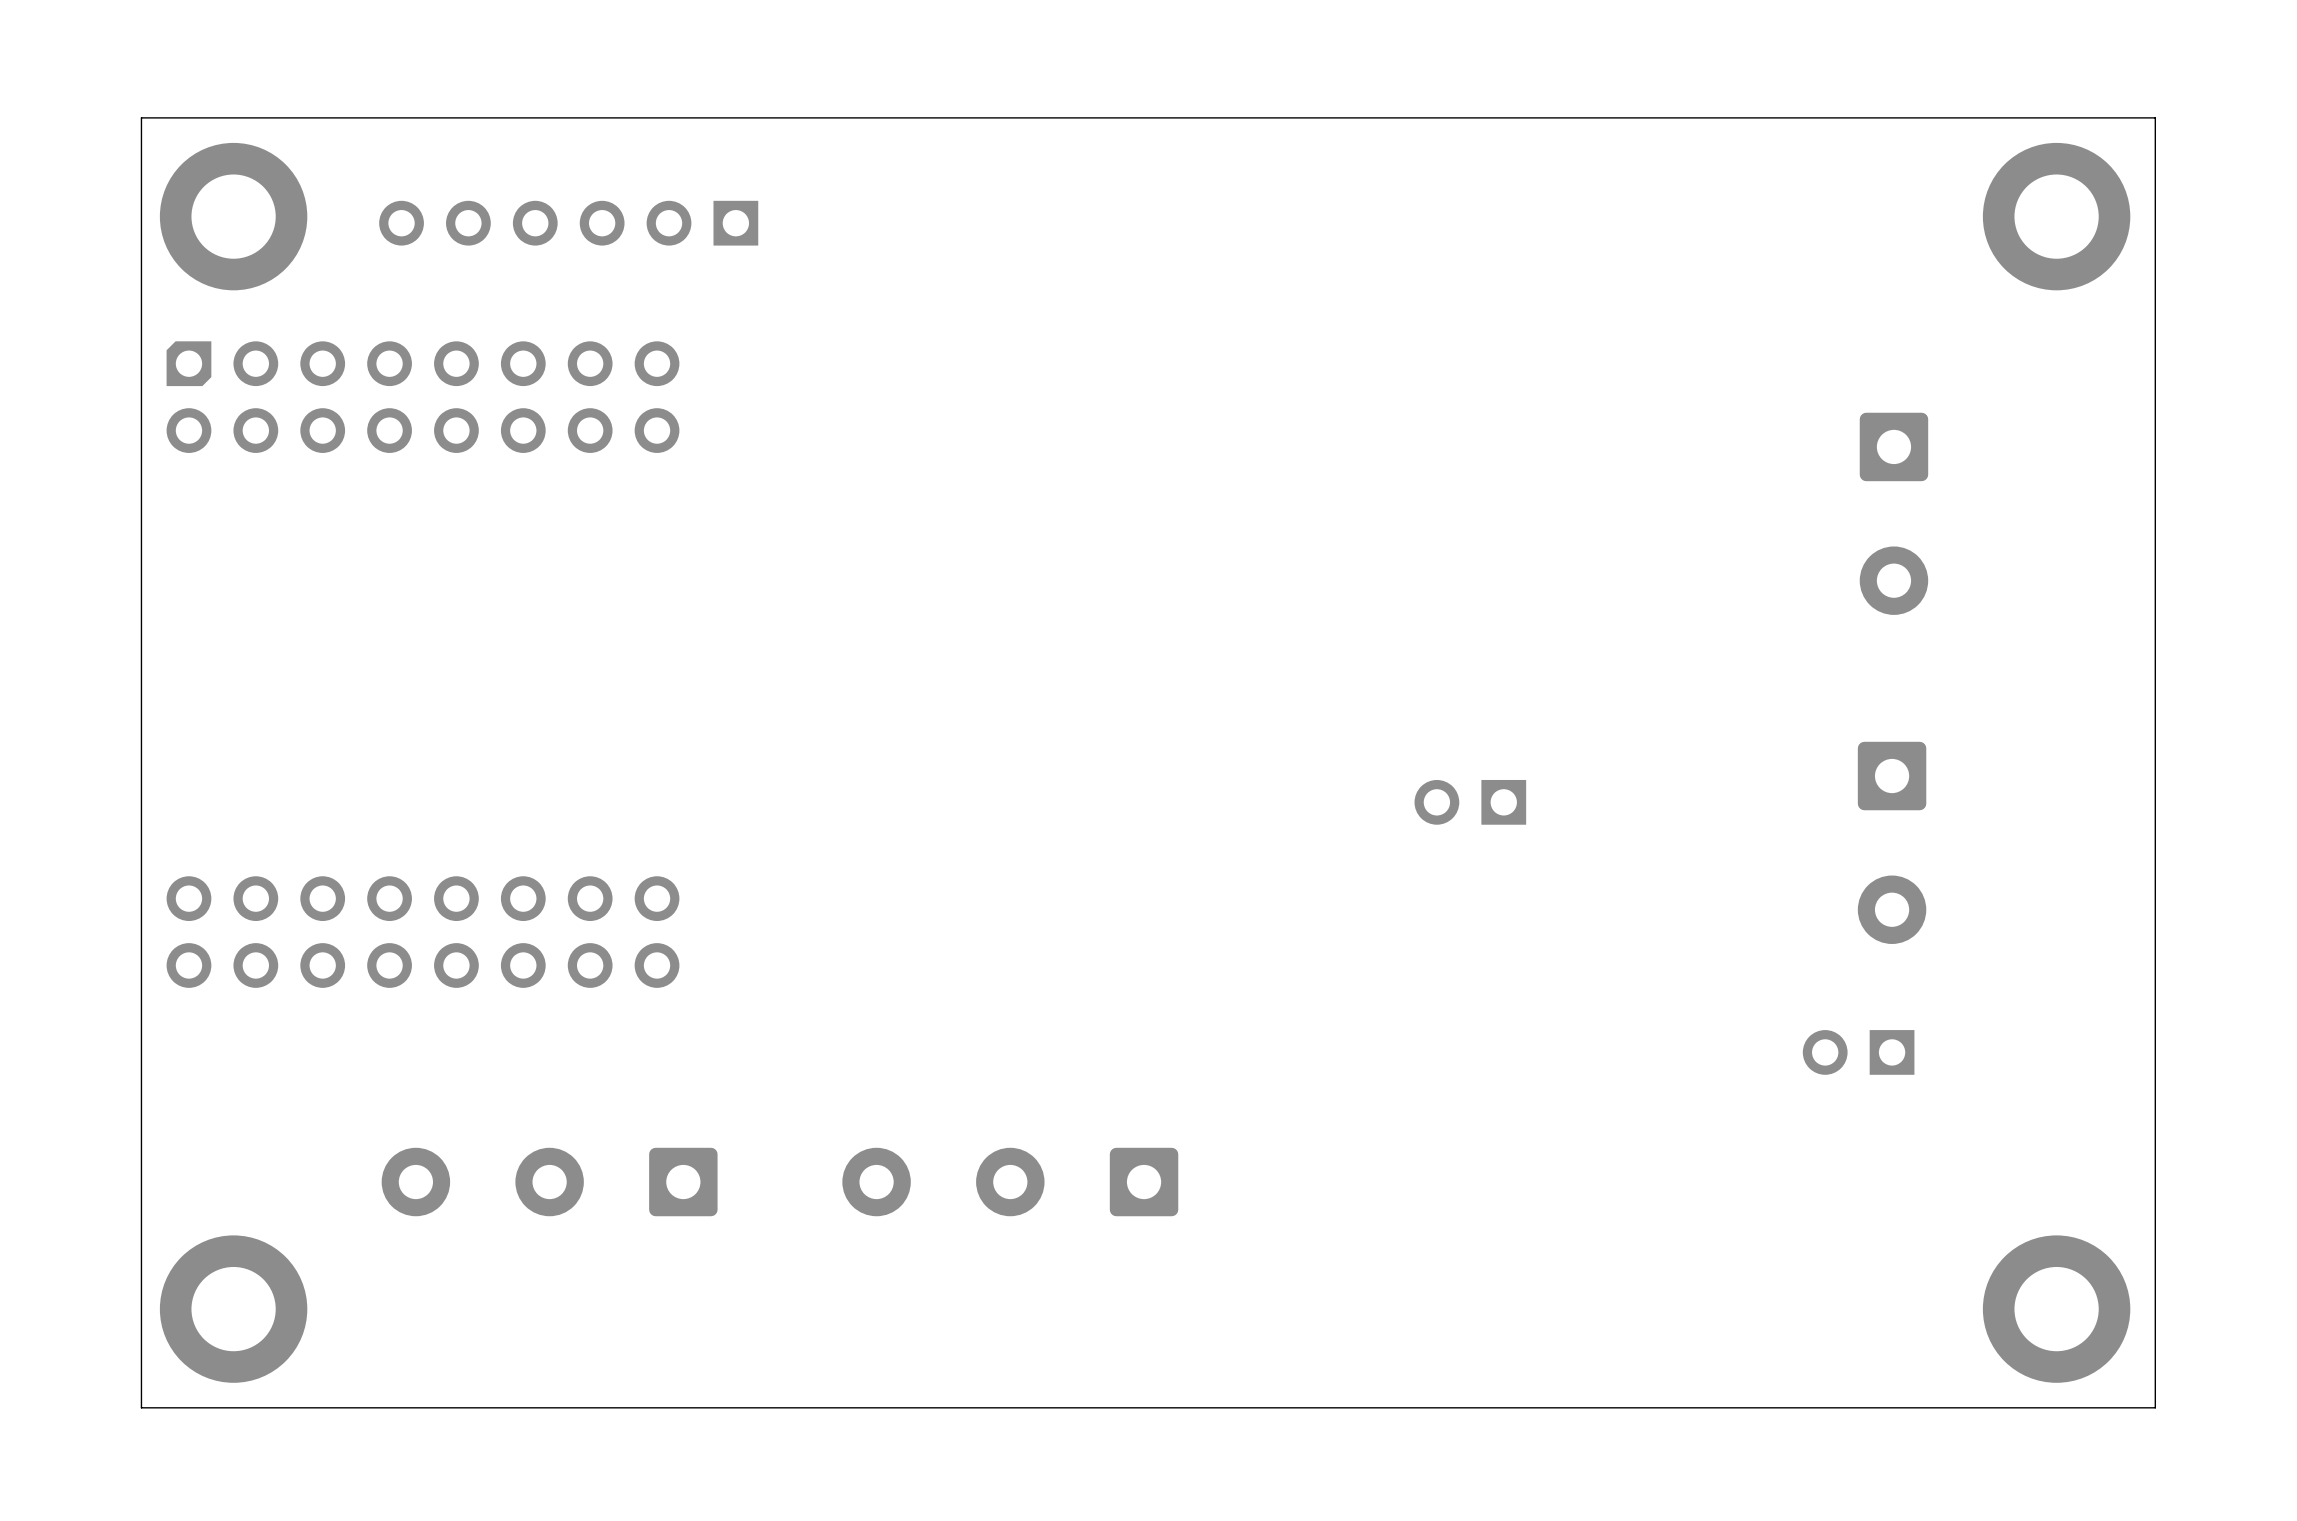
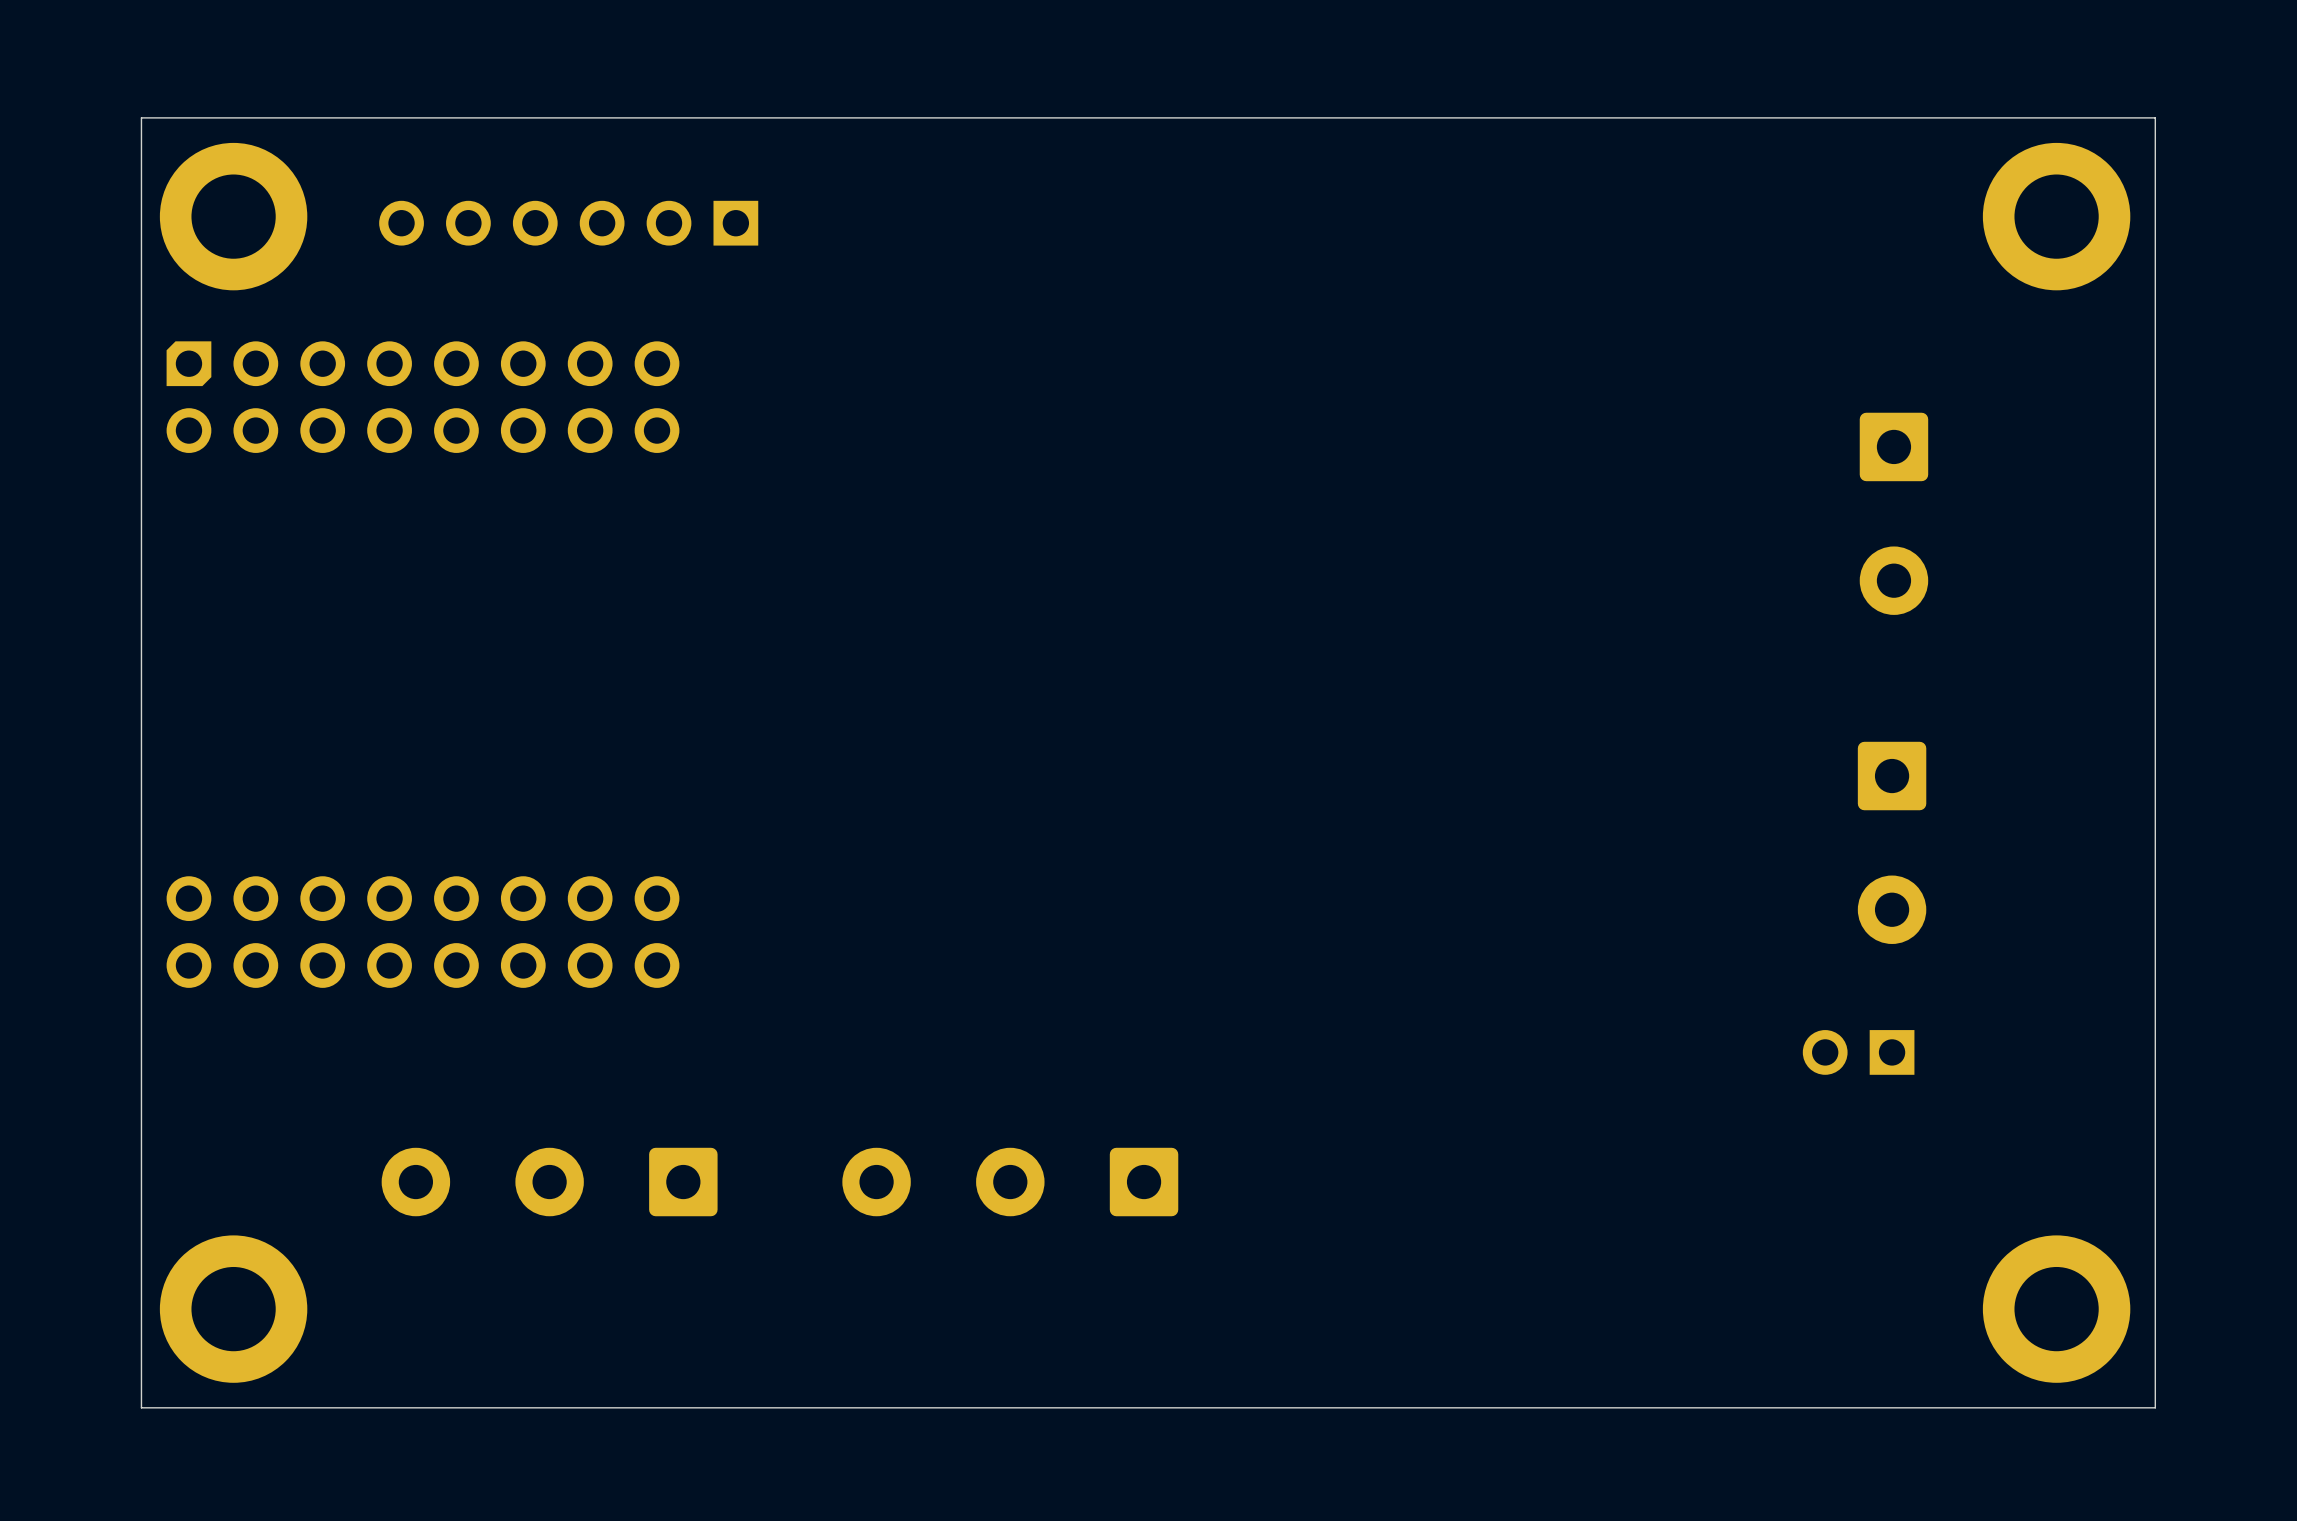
part: (1470, 802) -> none

